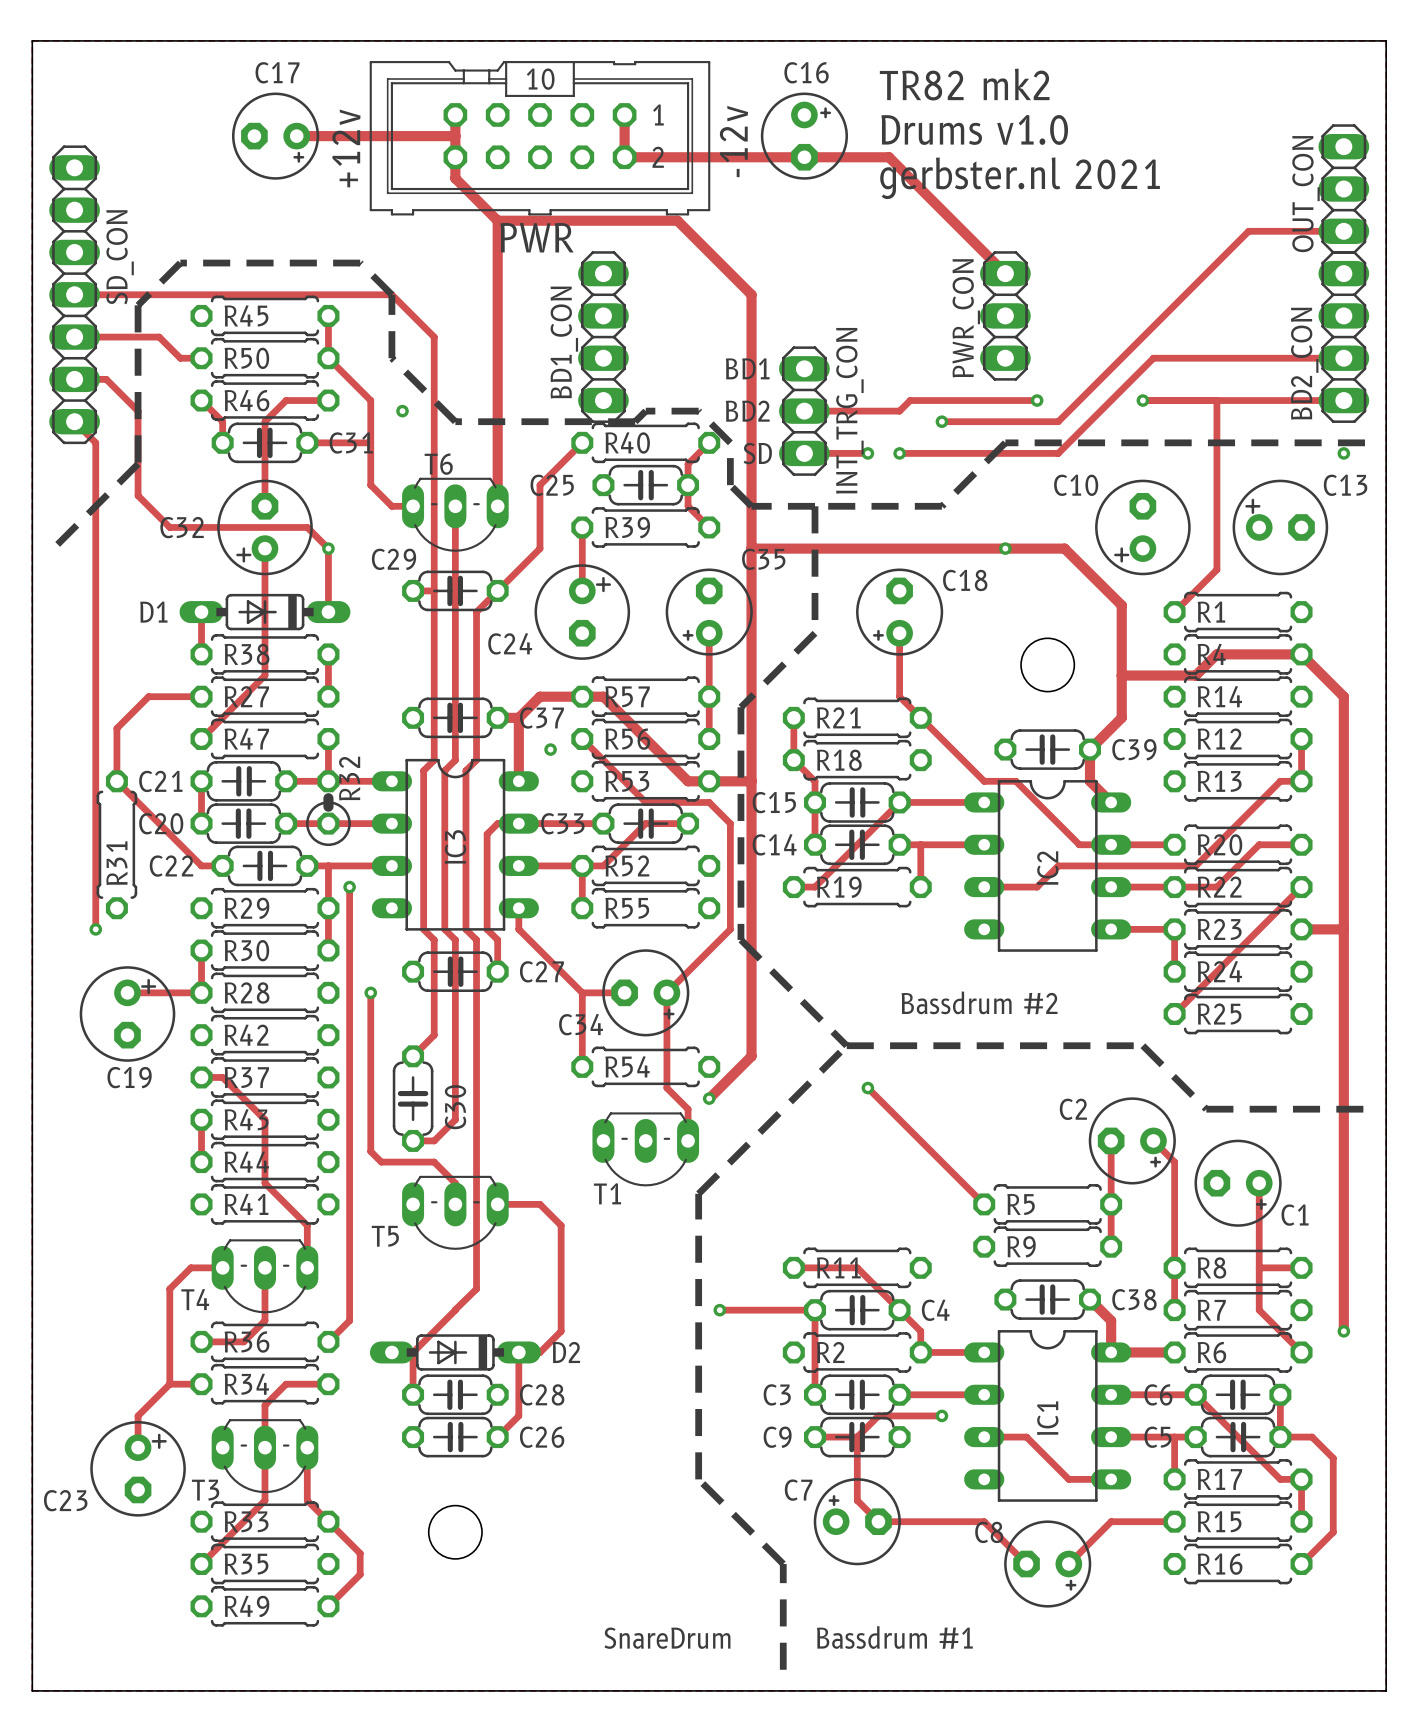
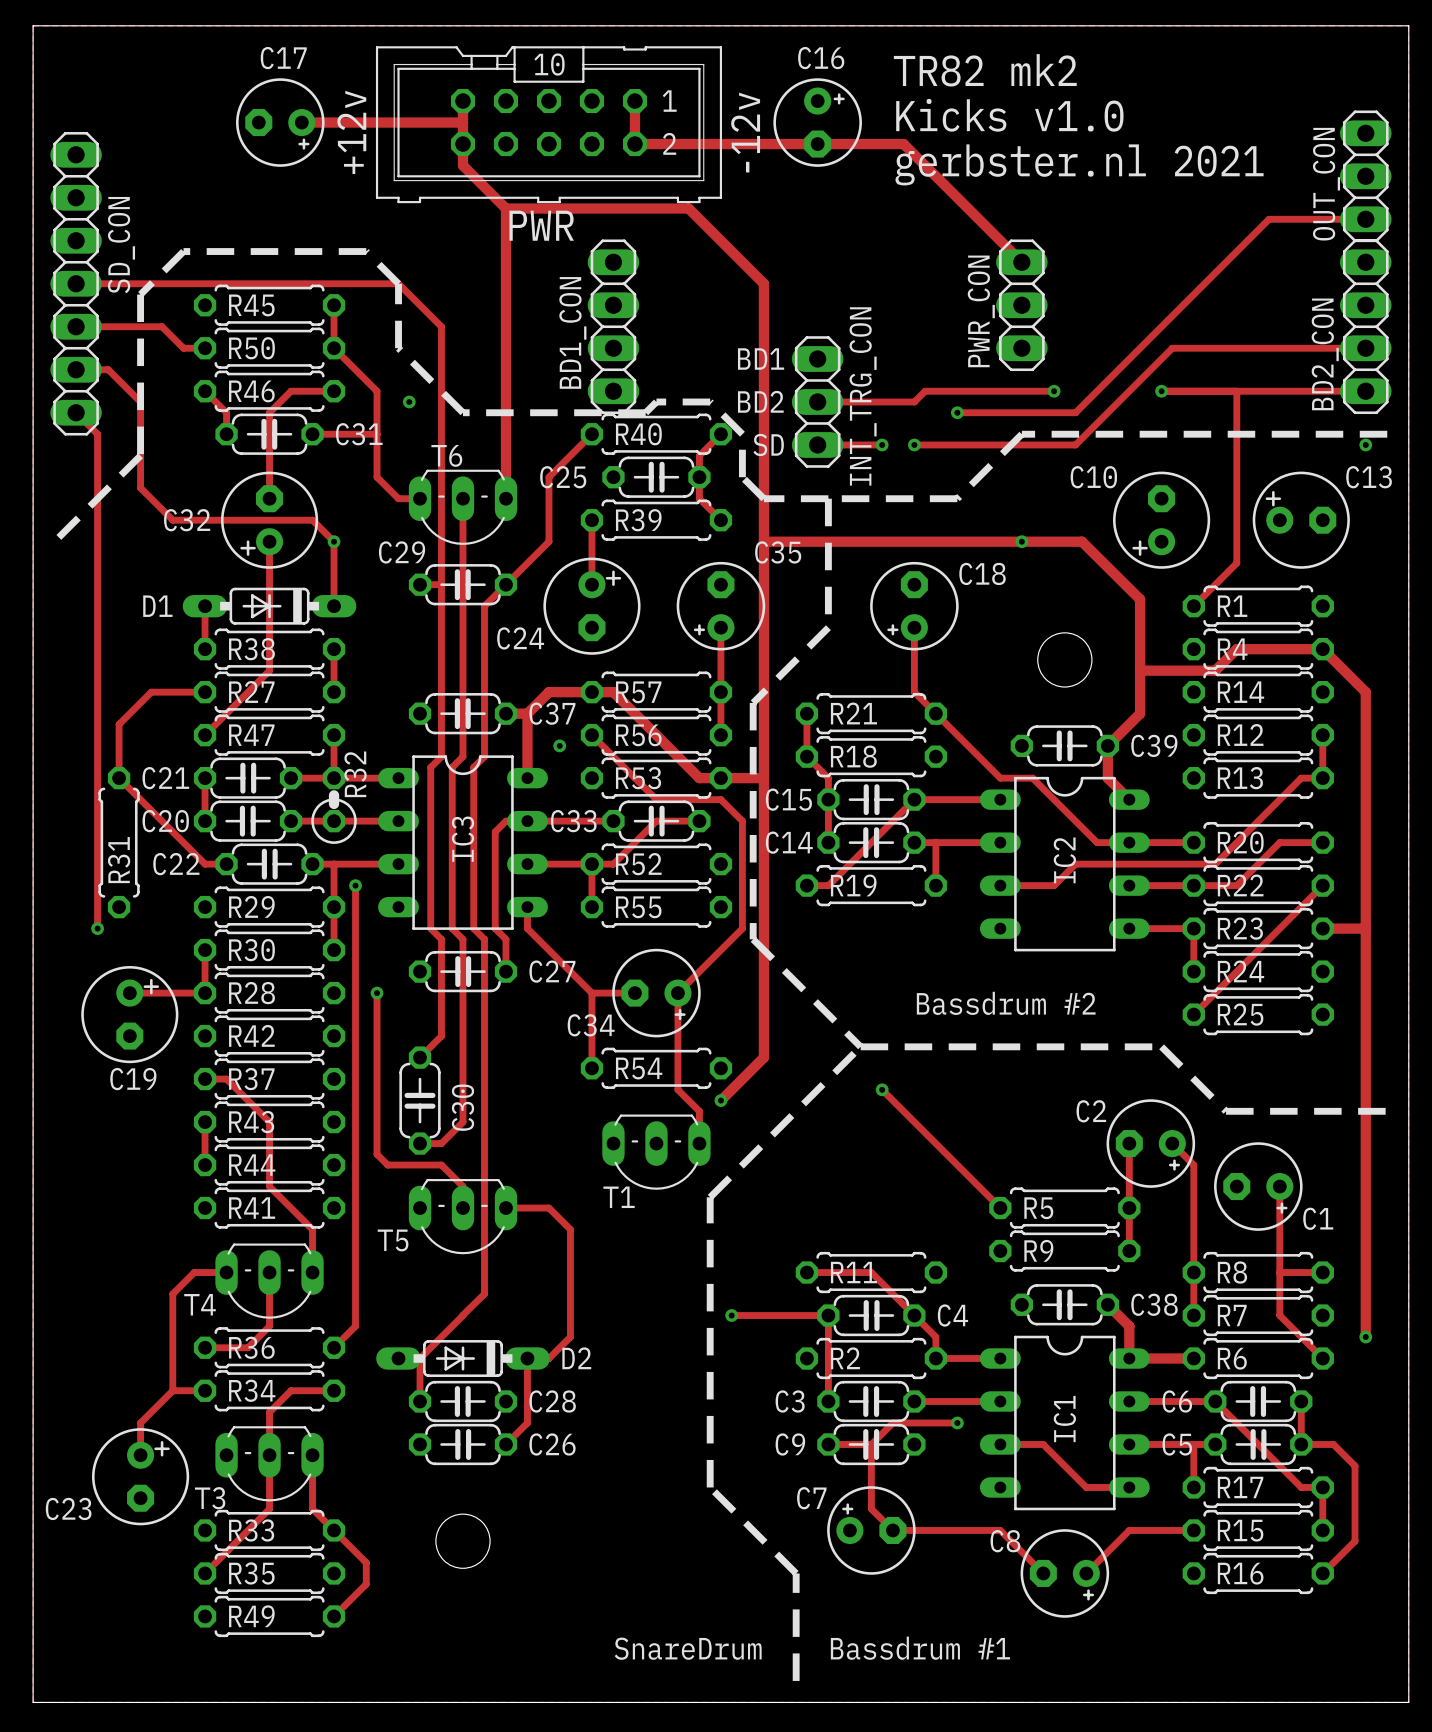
text: Drums v1.0 (974, 129) -> Kicks v1.0 (1009, 115)

